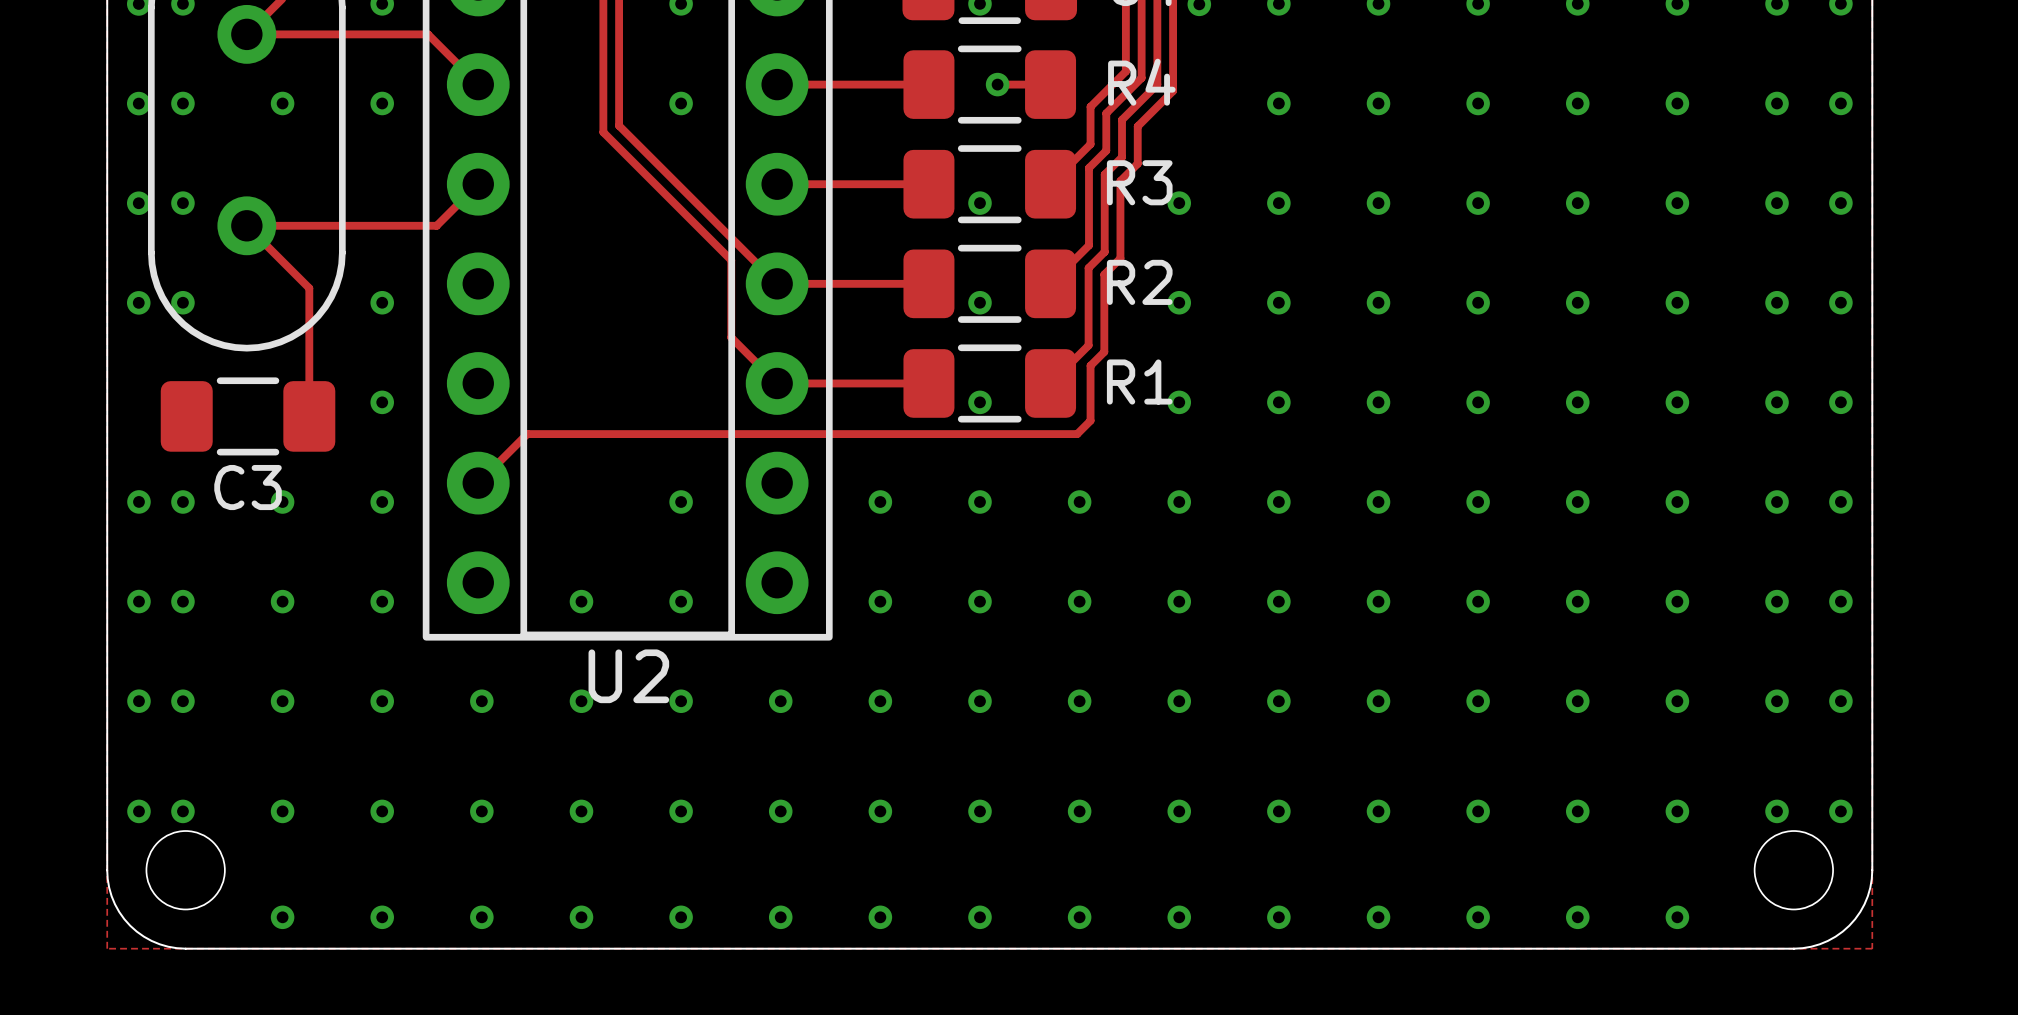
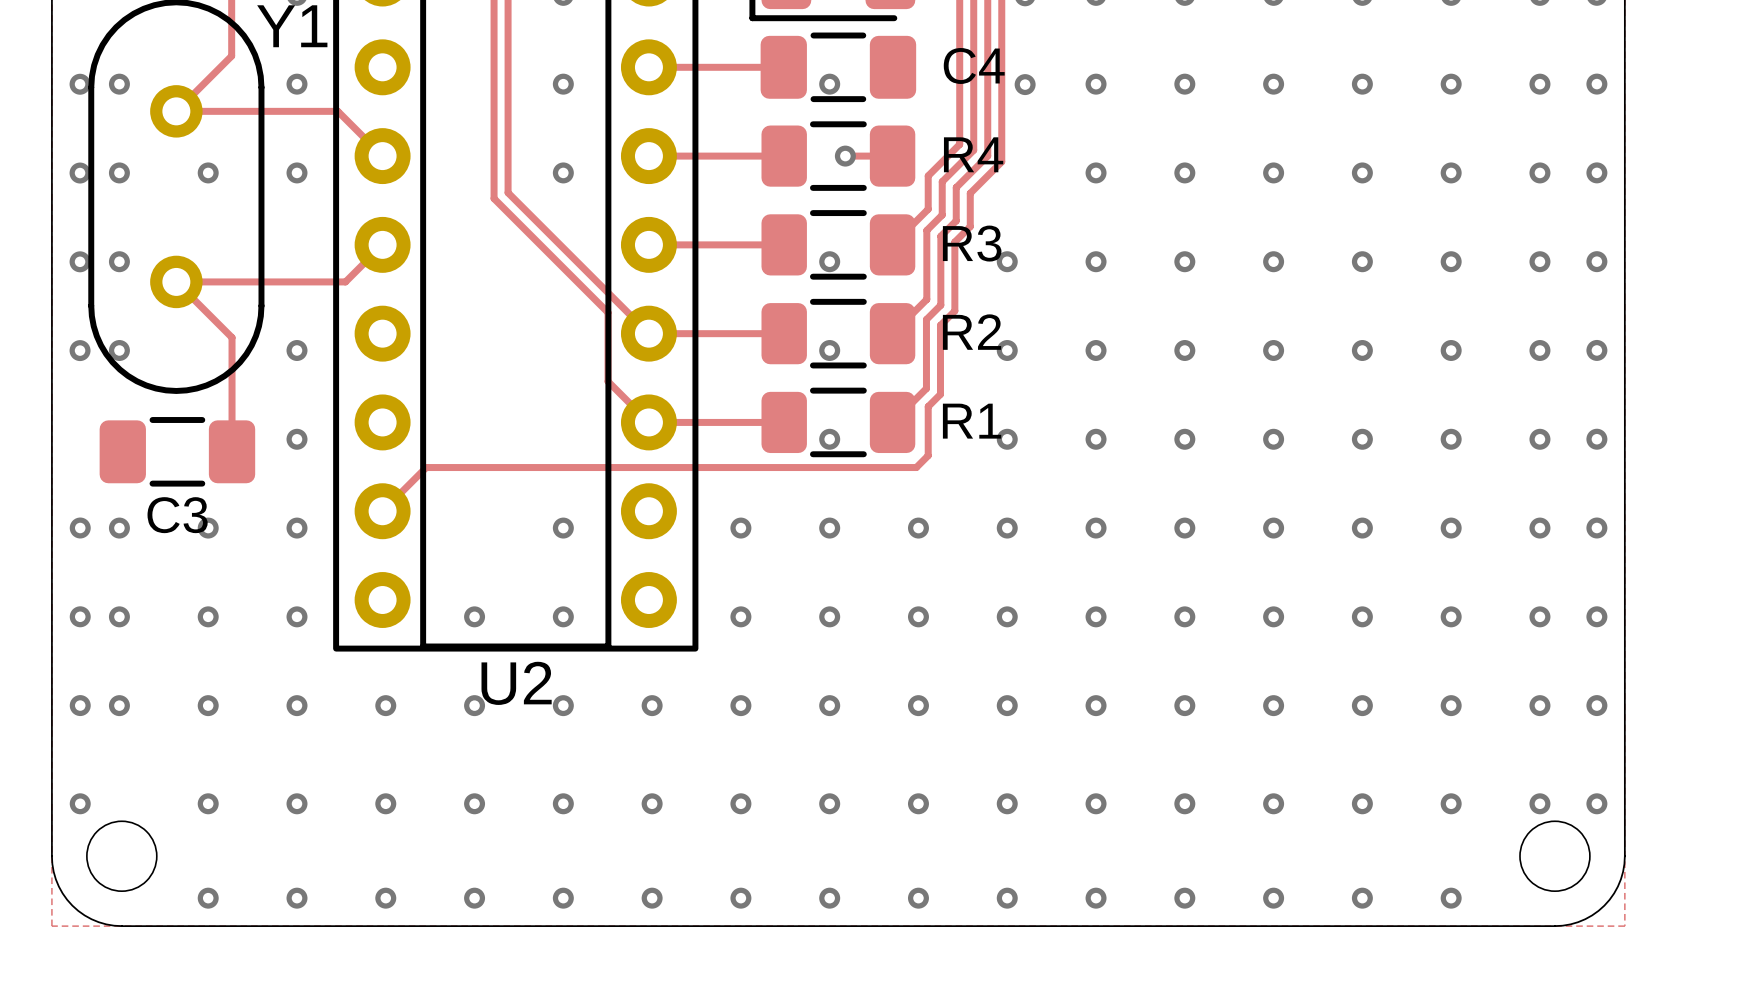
via: (182, 811) -> none

